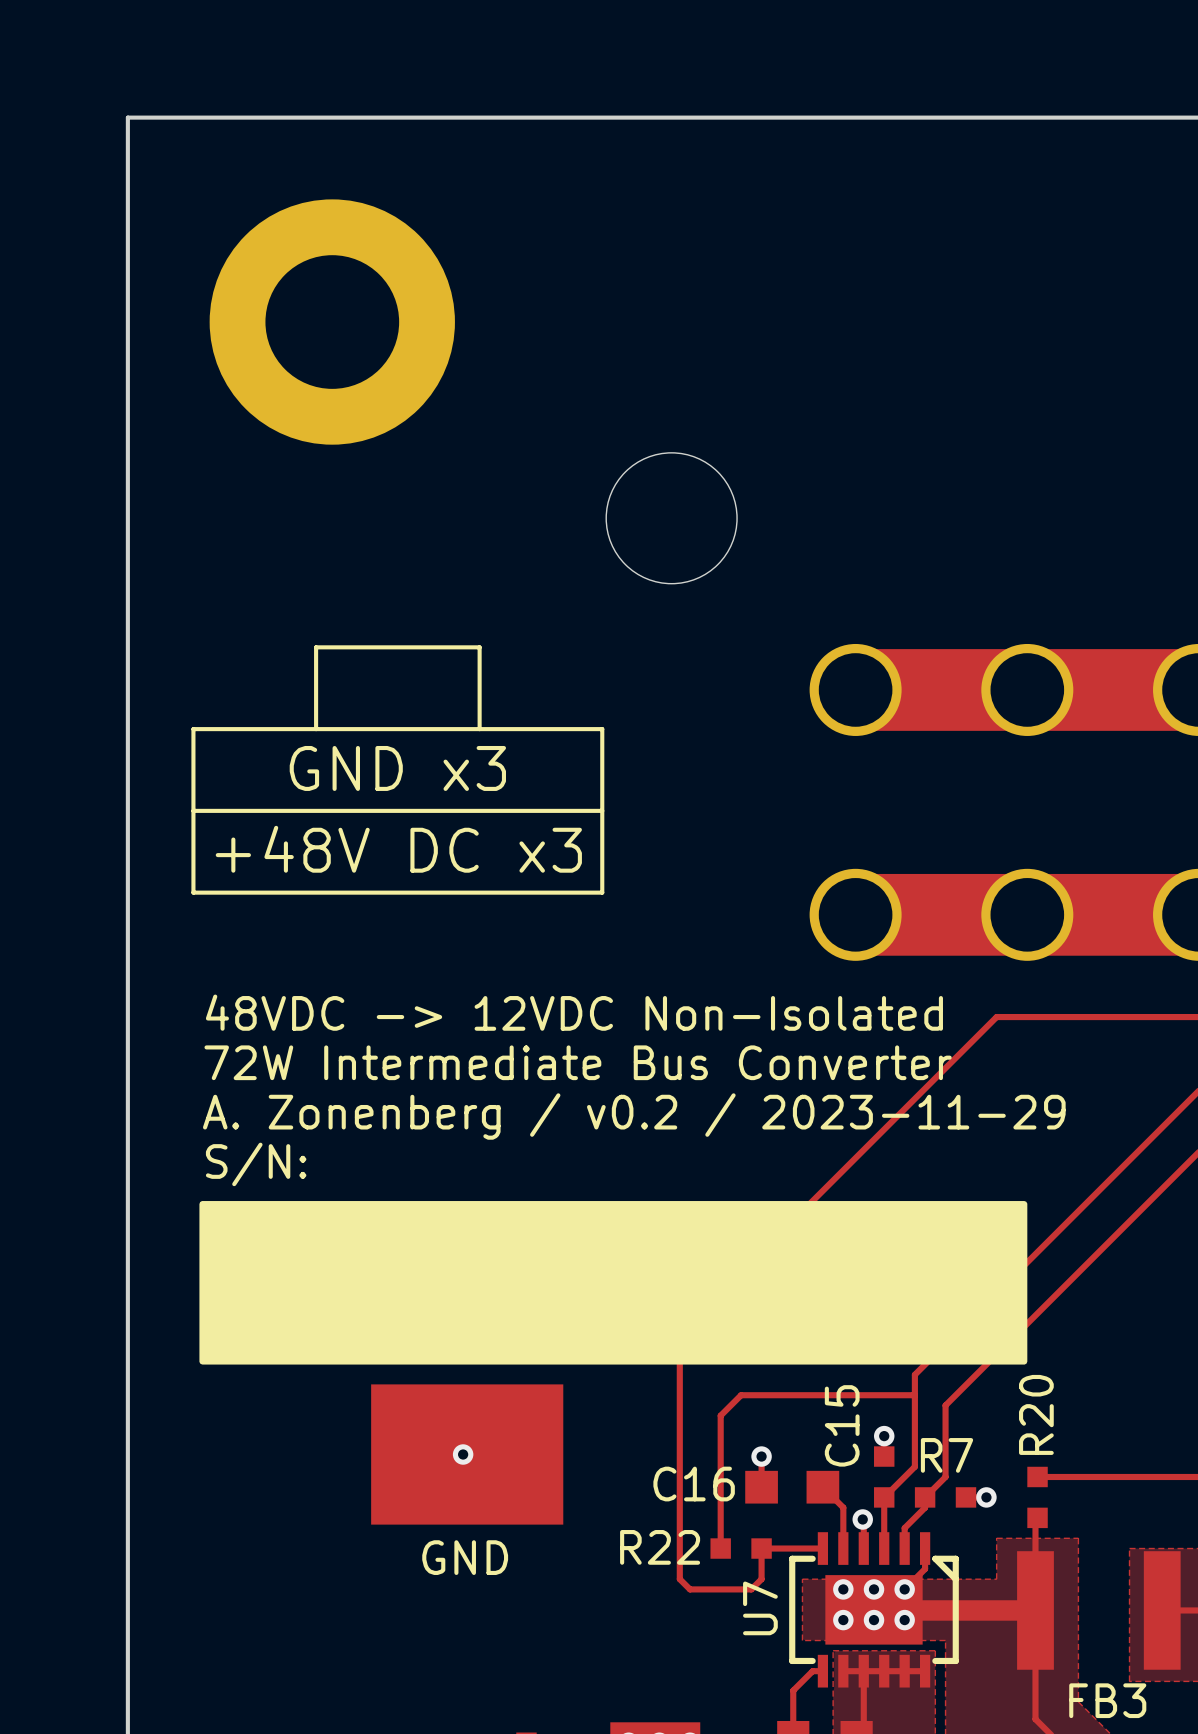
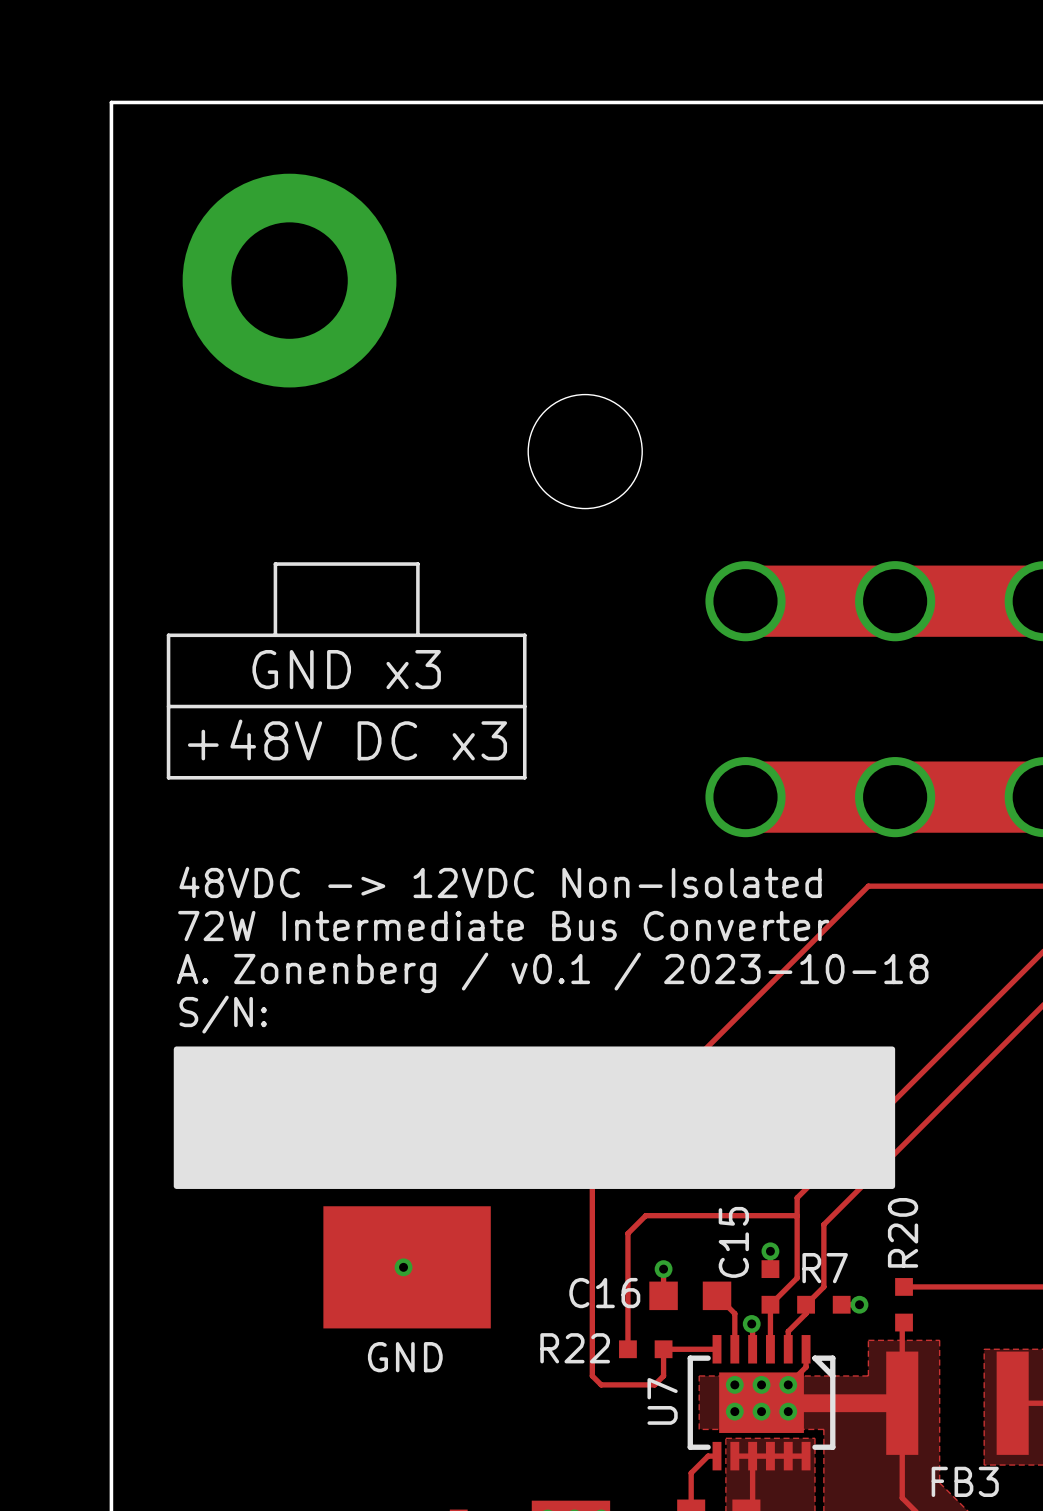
text: A. Zonenberg / v0.2 / 2023-11-29 (634, 1116) -> A. Zonenberg / v0.1 / 2023-10-18 (552, 972)

